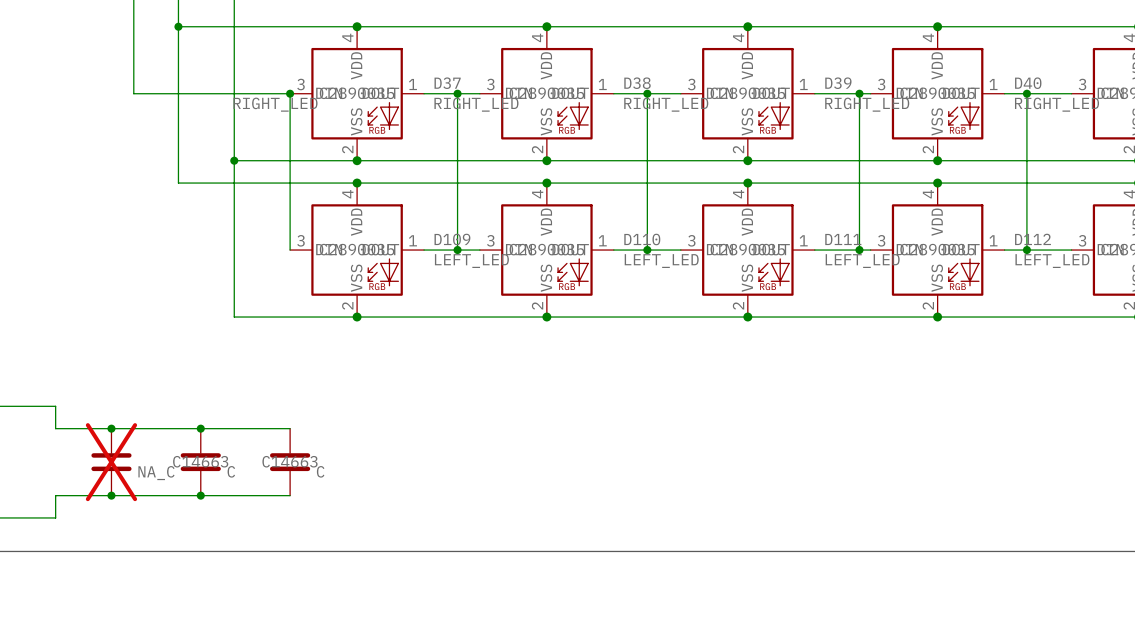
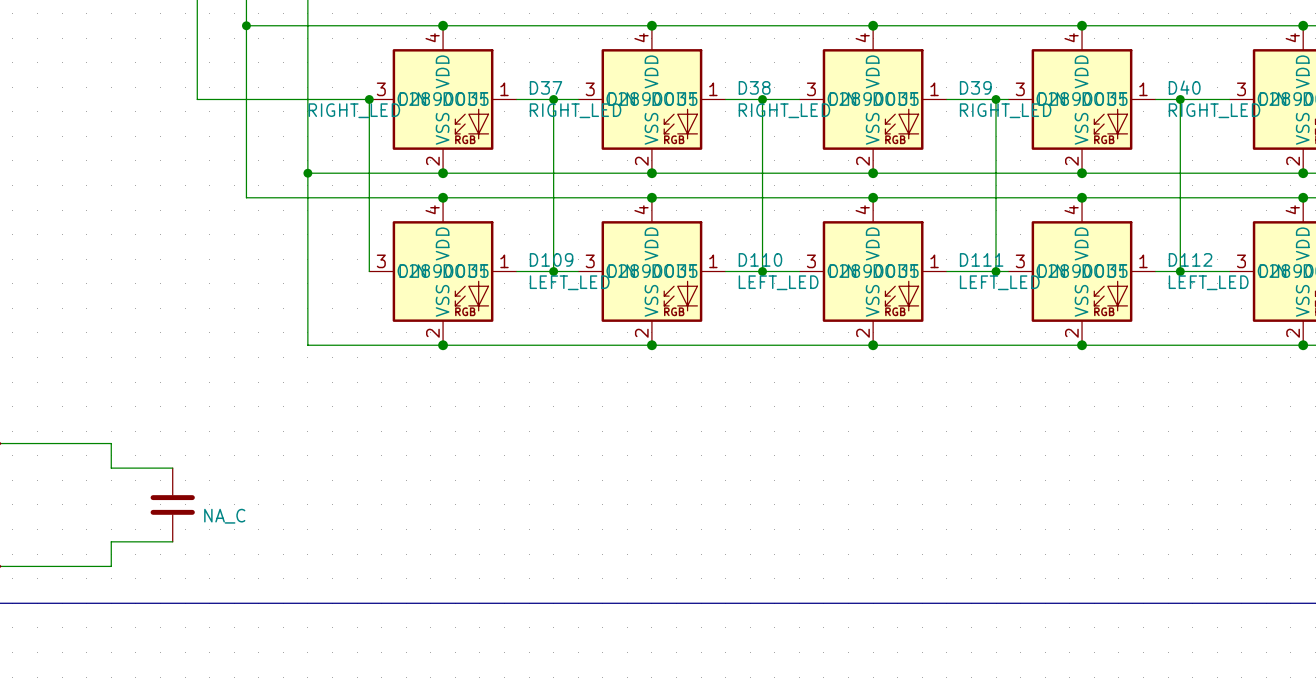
wire: (111, 428) (290, 428) -> none
junction: (111, 428) -> none
junction: (200, 428) -> none
part do-not-place cross: (111, 462) -> none
part: C (200, 462) -> none
part: C (290, 462) -> none
wire: (111, 495) (290, 495) -> none
junction: (111, 495) -> none
junction: (200, 495) -> none

